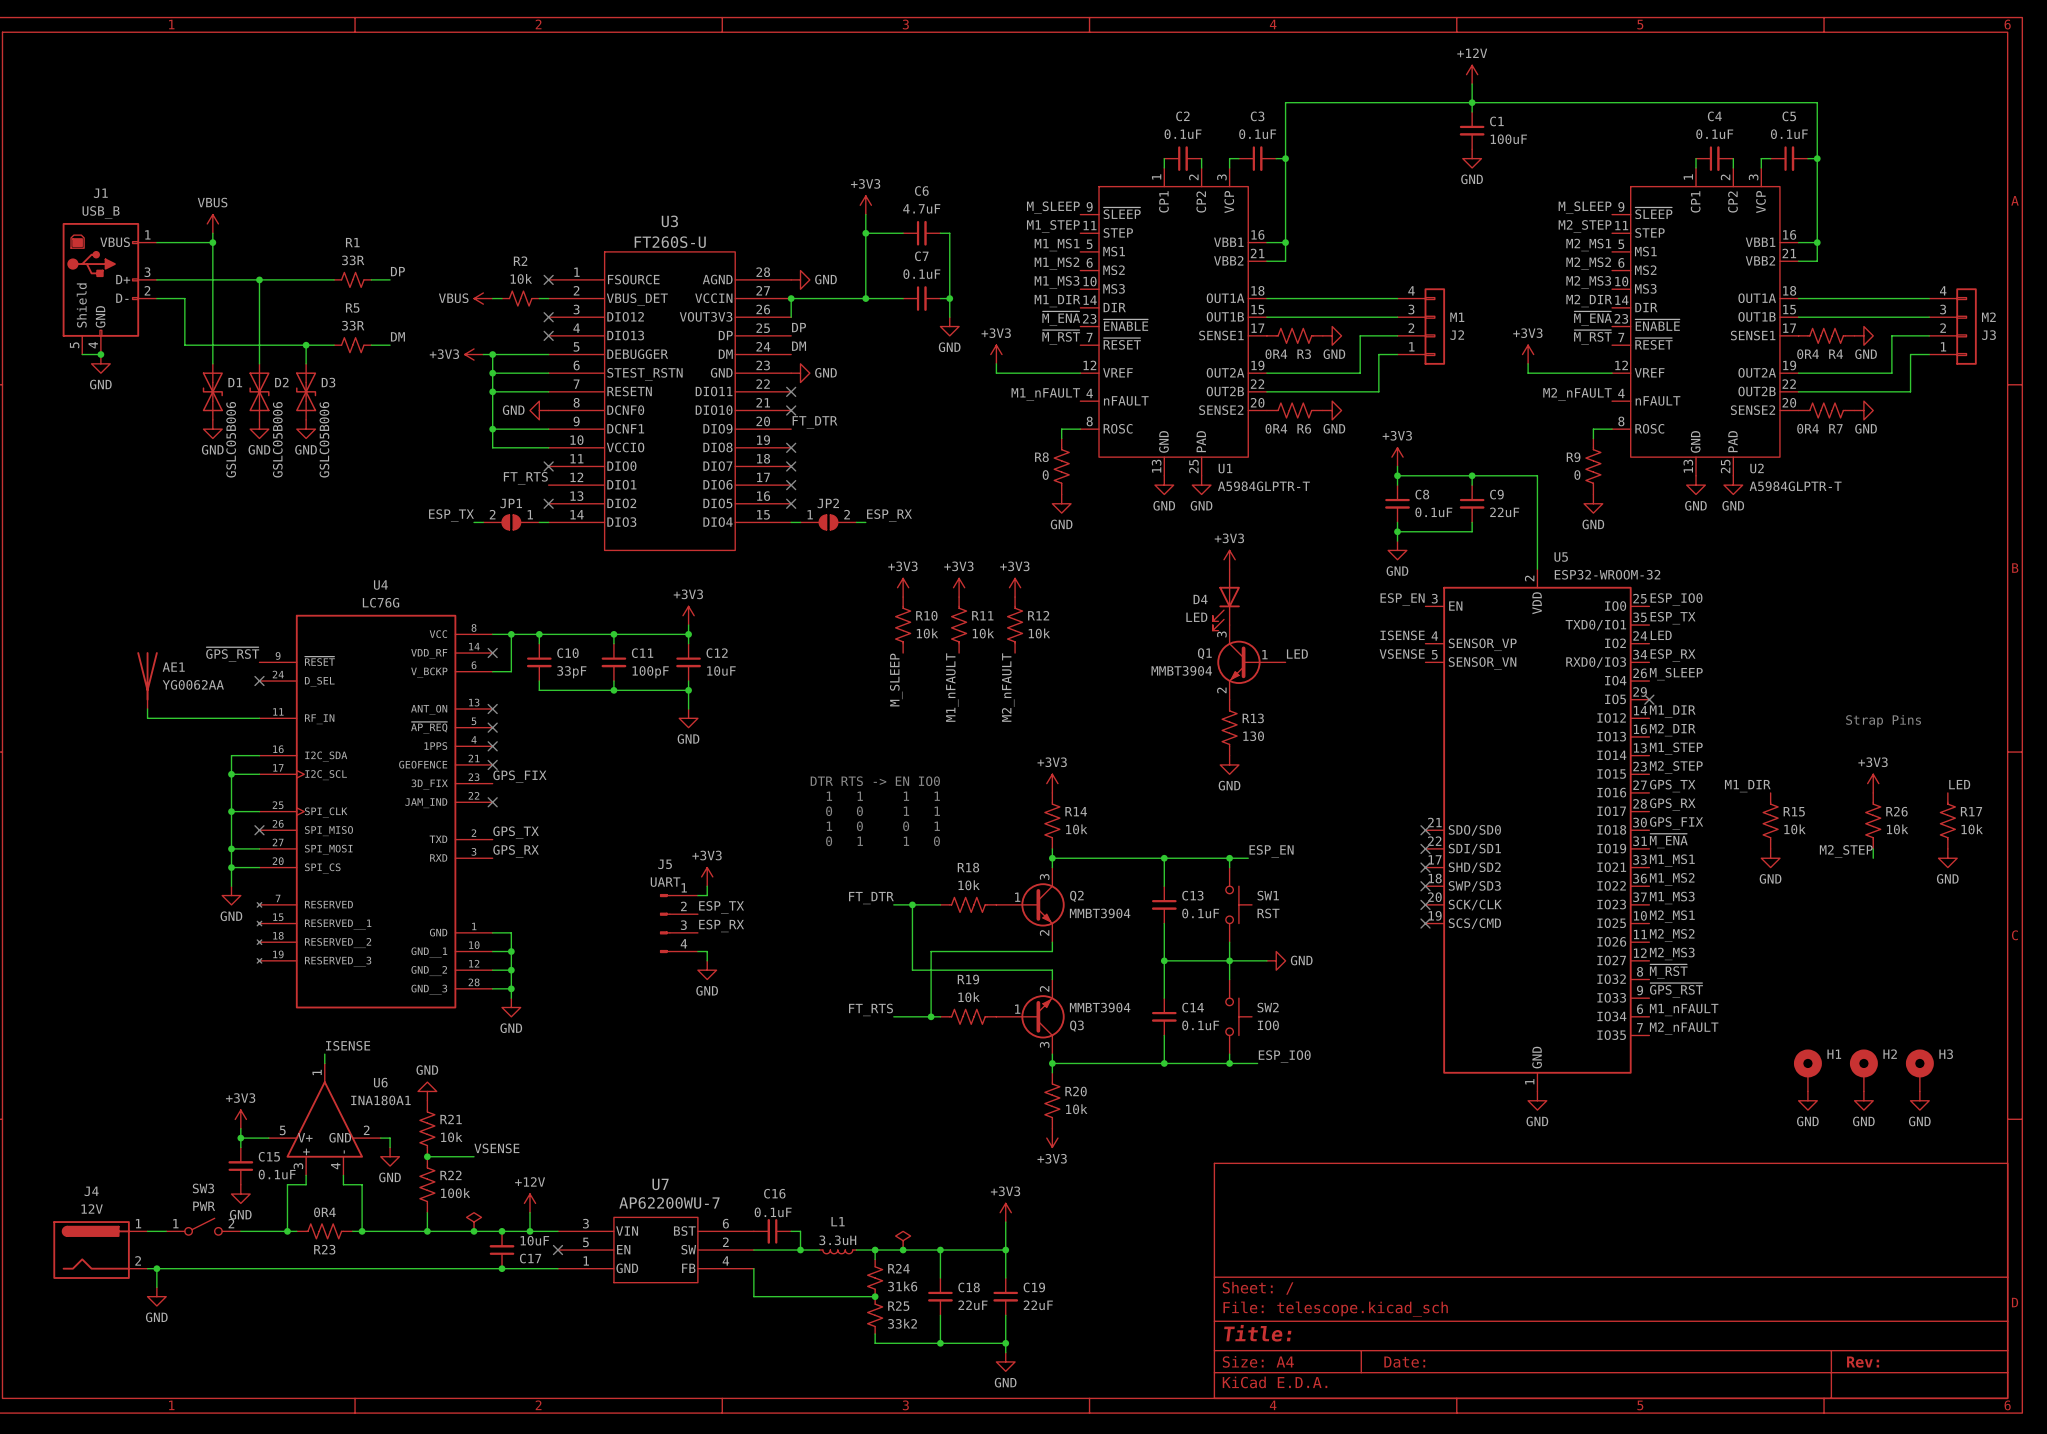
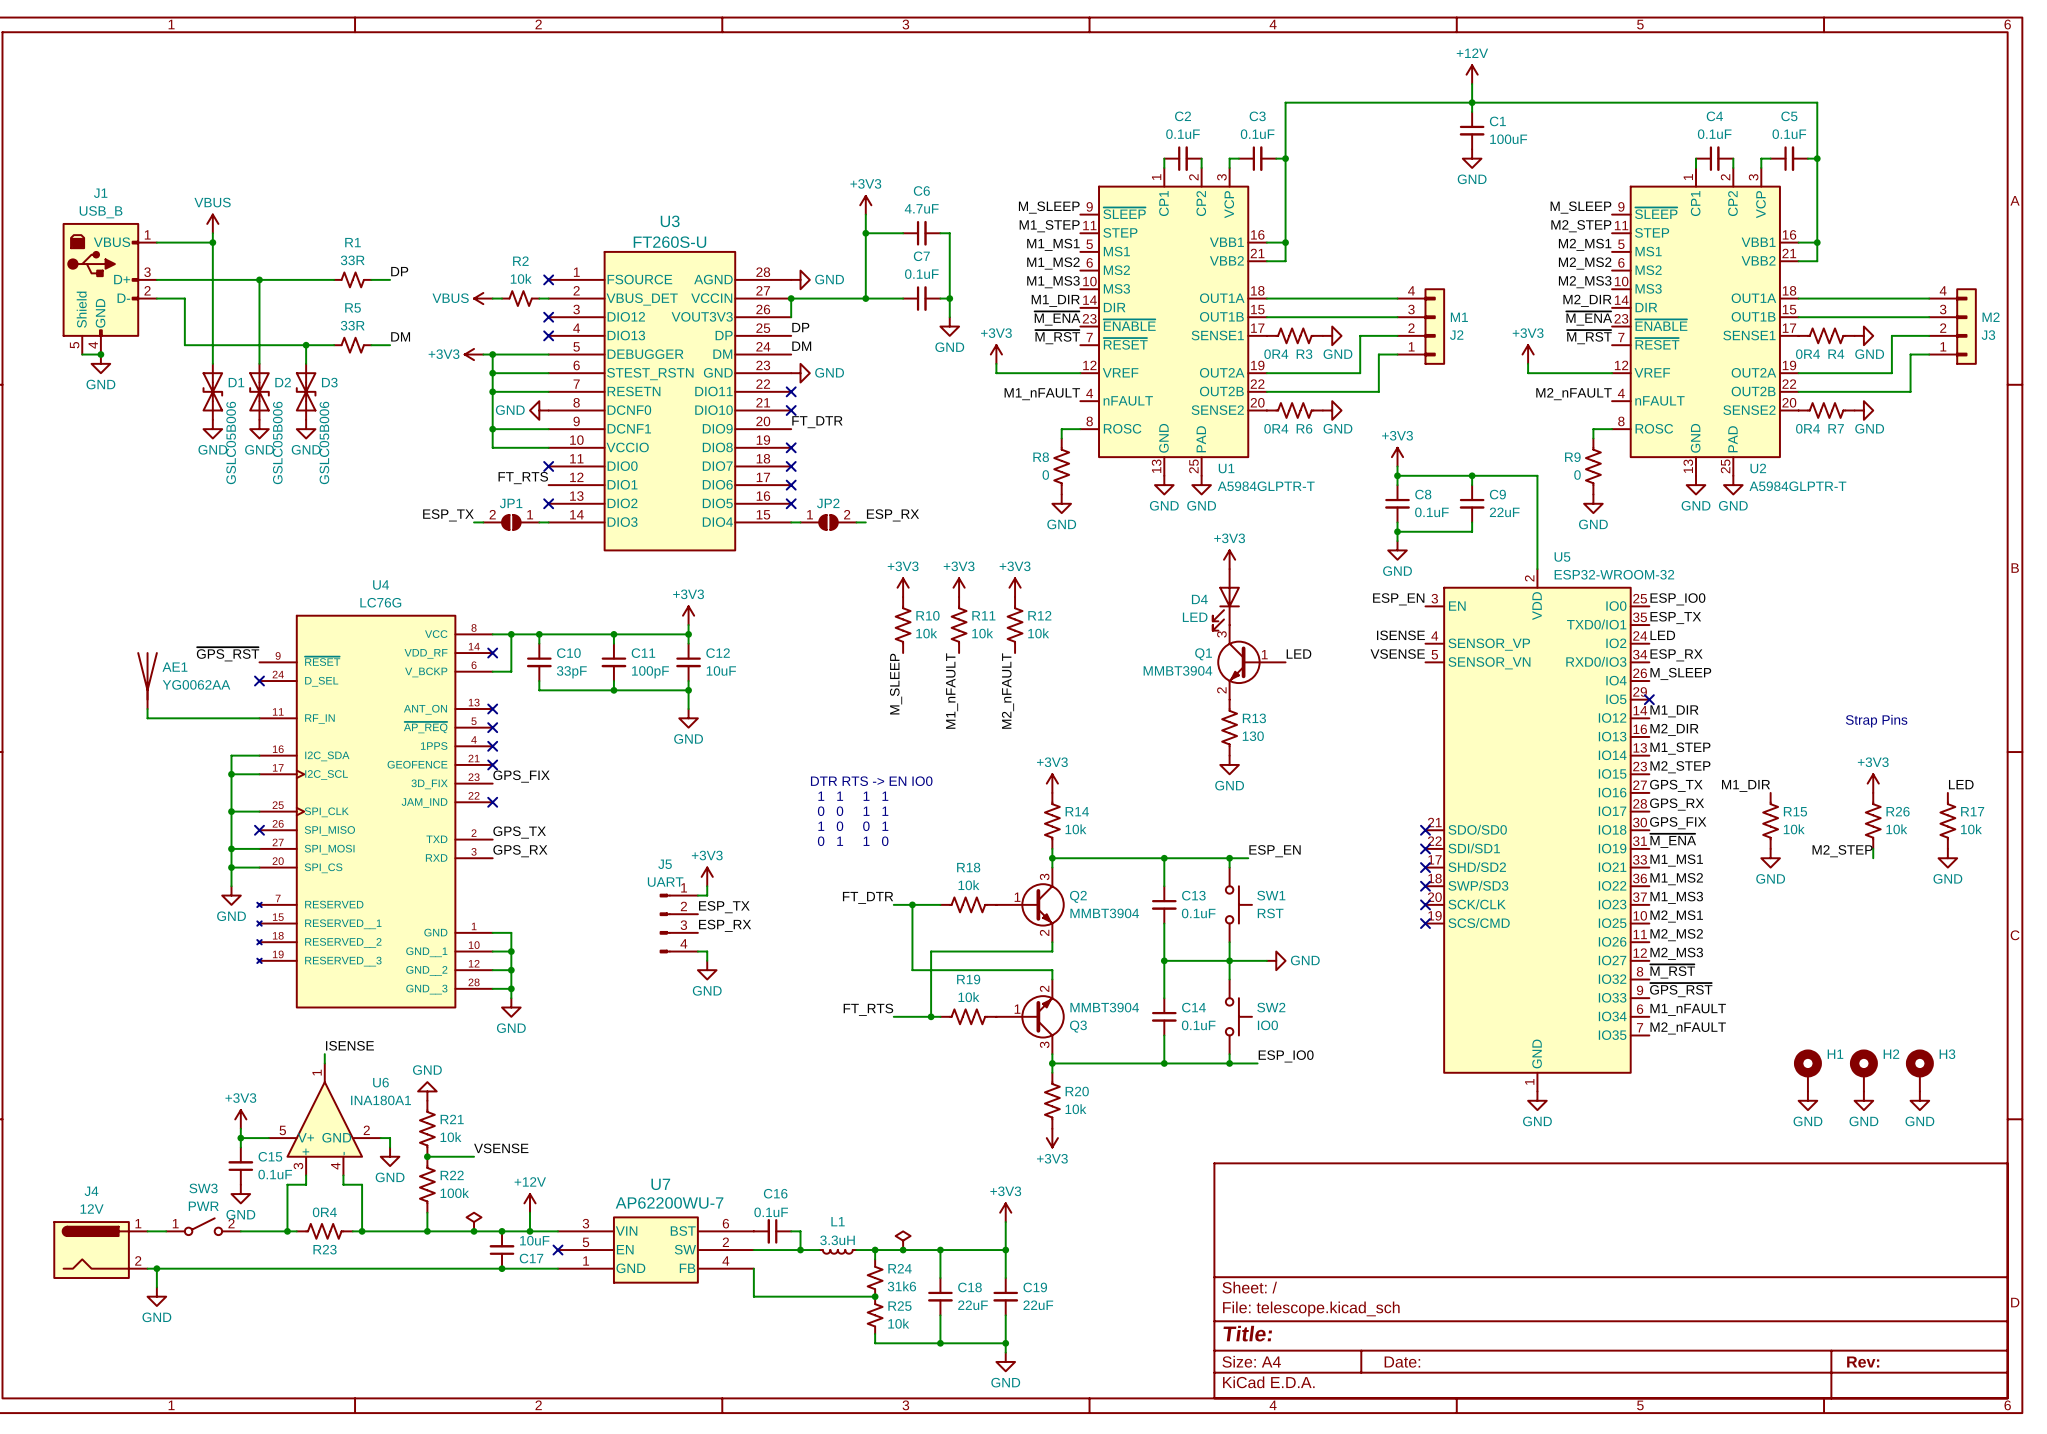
R25 value: 33k2 (902, 1323) -> 10k (898, 1323)

